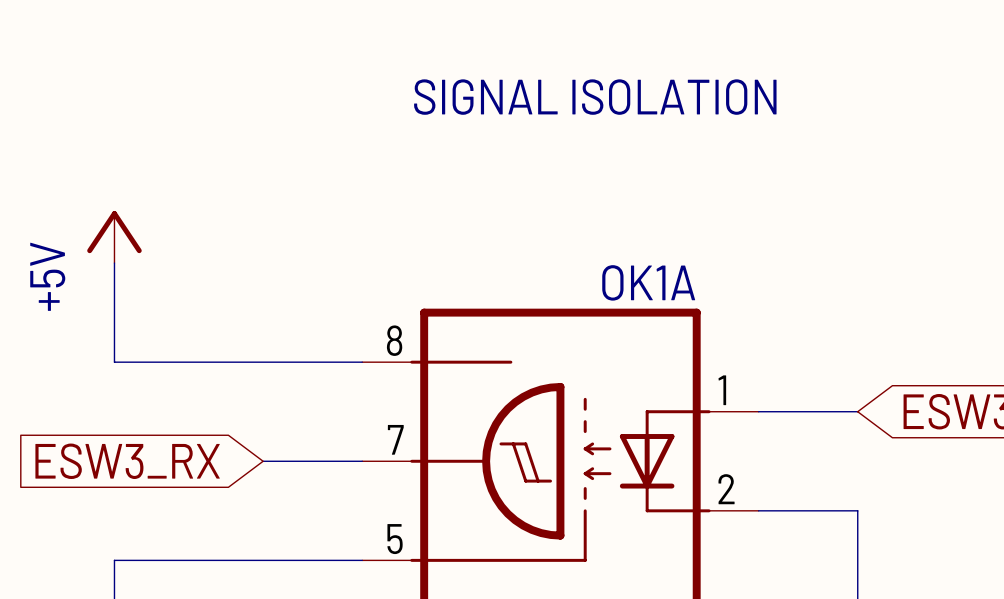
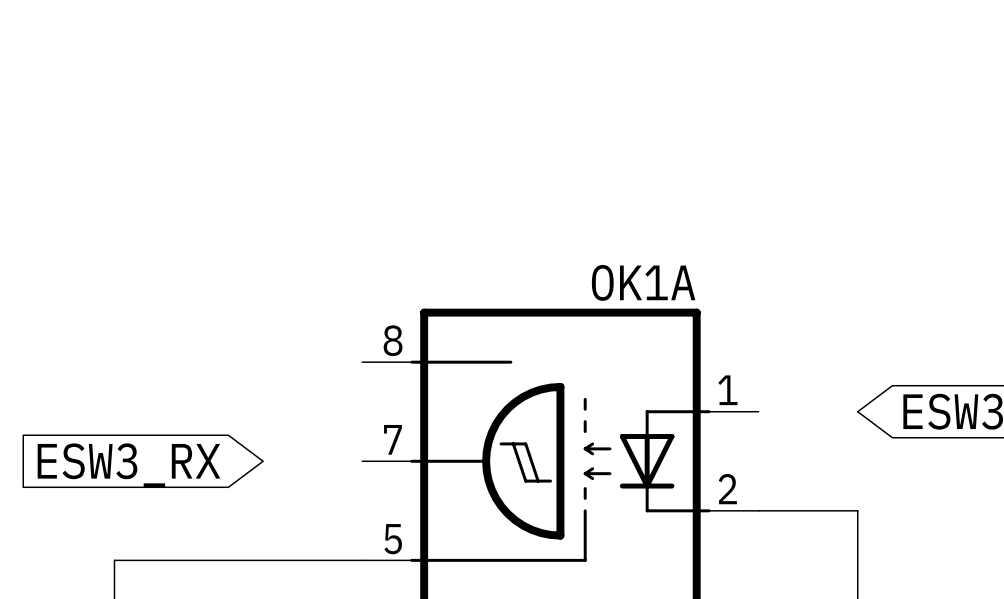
text: SIGNAL ISOLATION (595, 97) -> none
power symbol: +5V (114, 237) -> none
wire: (114, 263) (114, 362) (362, 362) -> none
wire: (758, 411) (857, 411) -> none
wire: (263, 461) (362, 461) -> none

